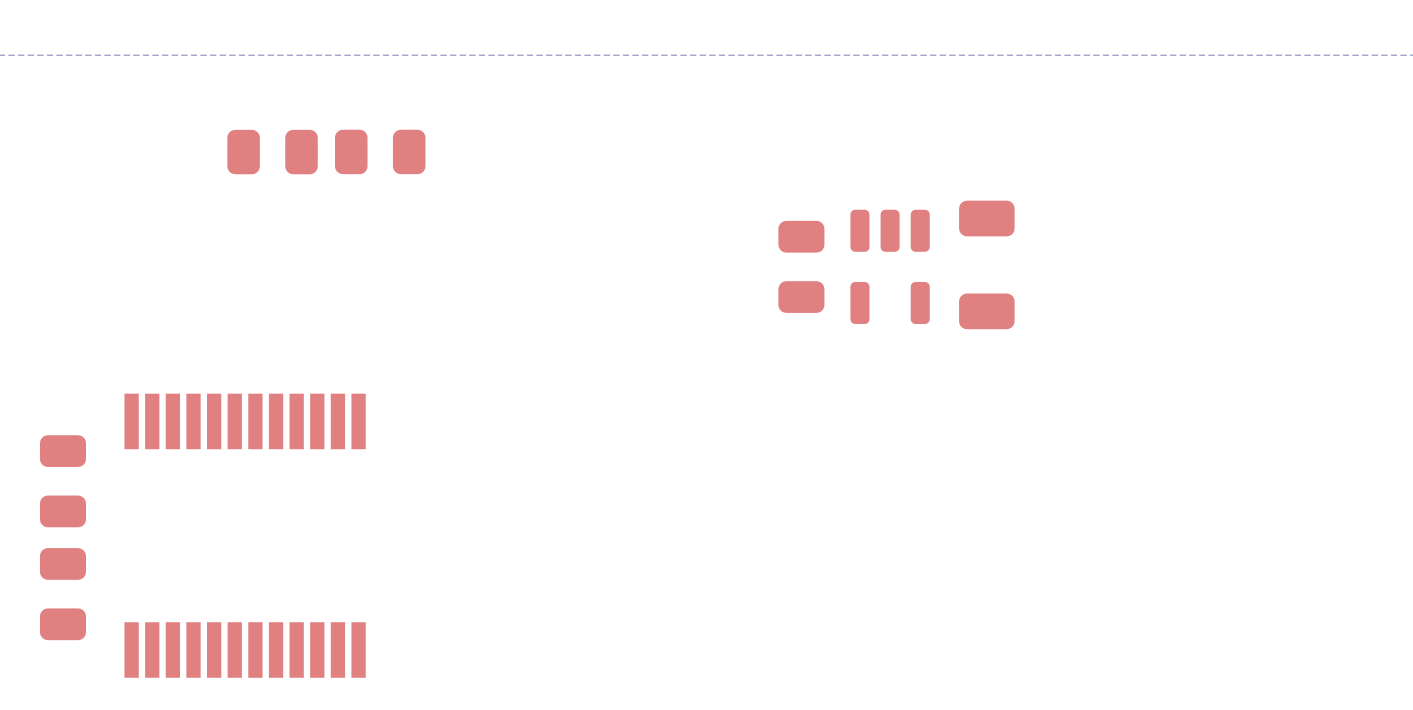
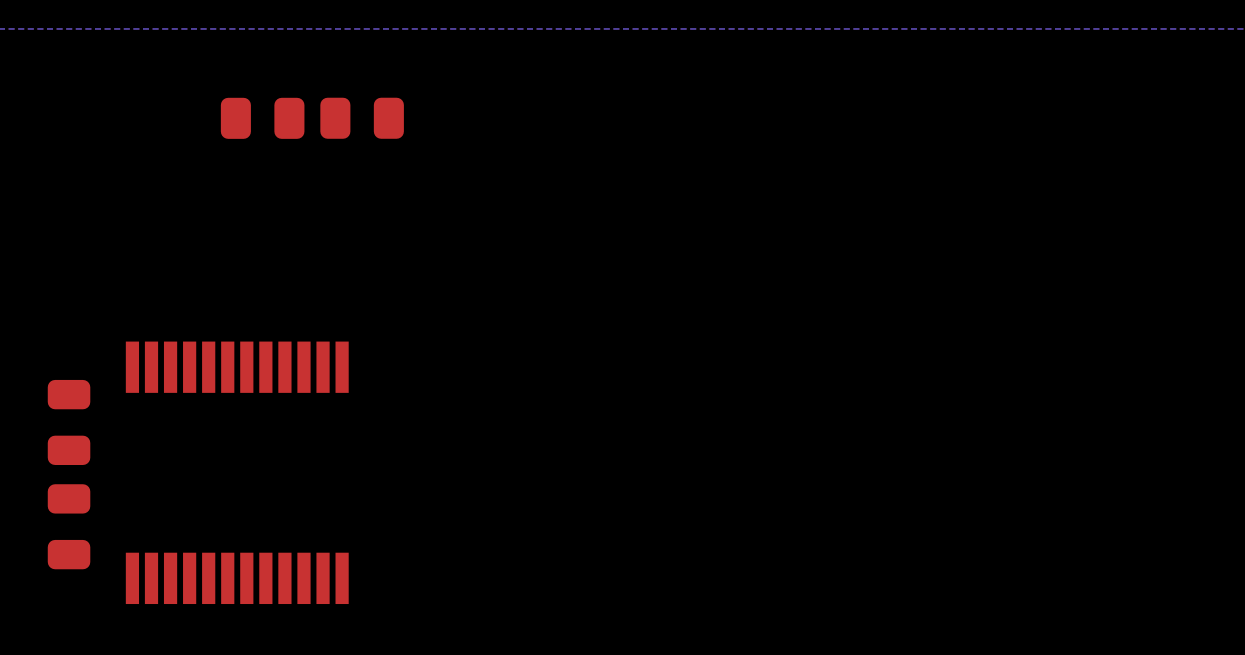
part: (986, 264) -> none
part: (801, 266) -> none
part: (890, 266) -> none

